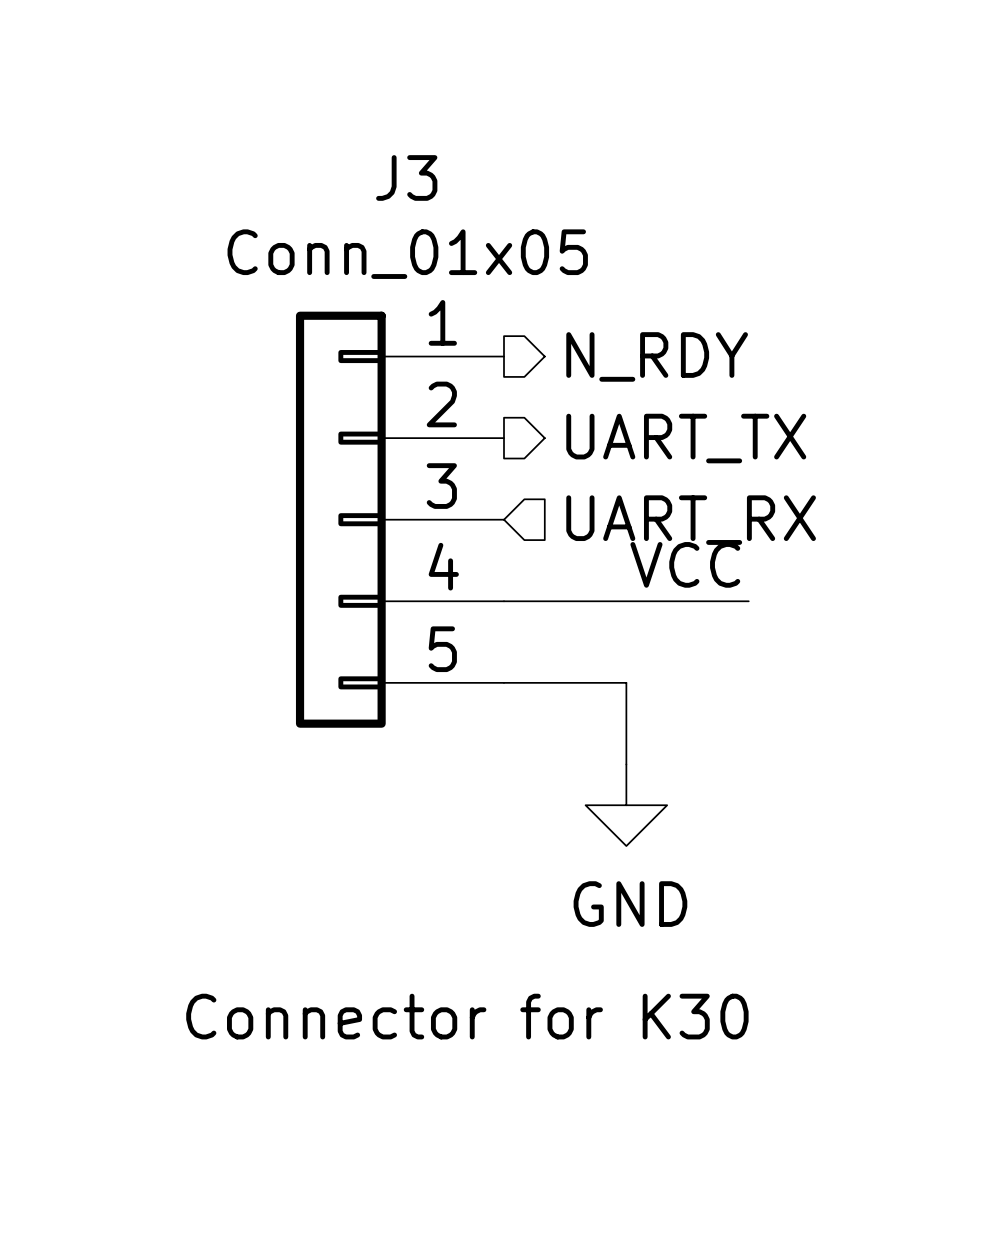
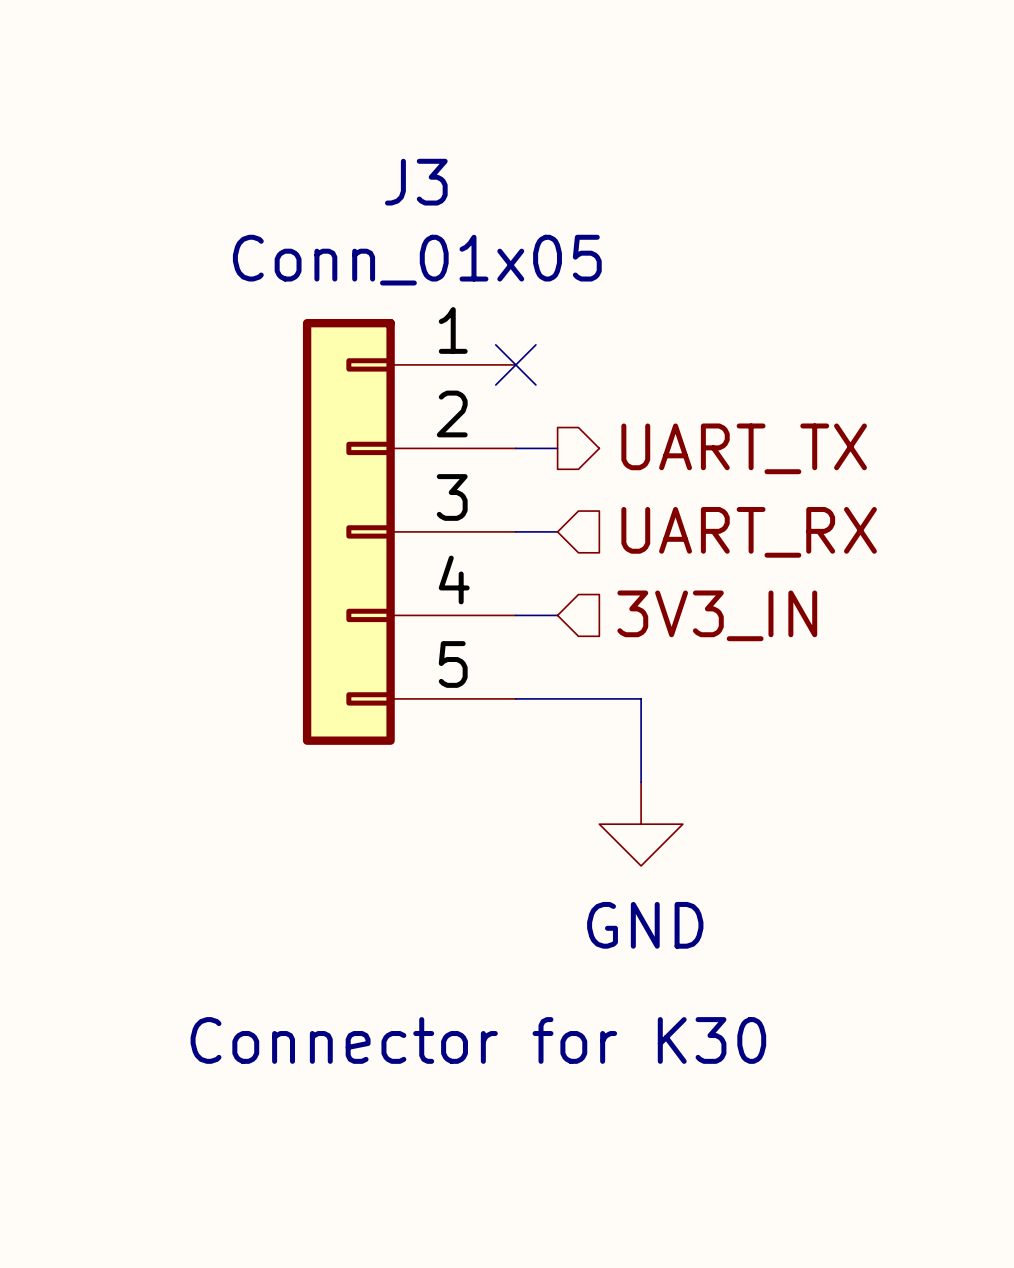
no-connect mark: none -> (515, 364)
hierarchical label: N_RDY (657, 356) -> none
wire: none -> (515, 448) (557, 448)
hierarchical label position: UART_TX (686, 438) -> UART_TX (744, 448)
wire: none -> (515, 531) (557, 531)
hierarchical label position: UART_RX (691, 520) -> UART_RX (749, 532)
label: VCC (685, 564) -> none
wire: (544, 601) (748, 601) -> none
hierarchical label: none -> 3V3_IN (717, 615)

